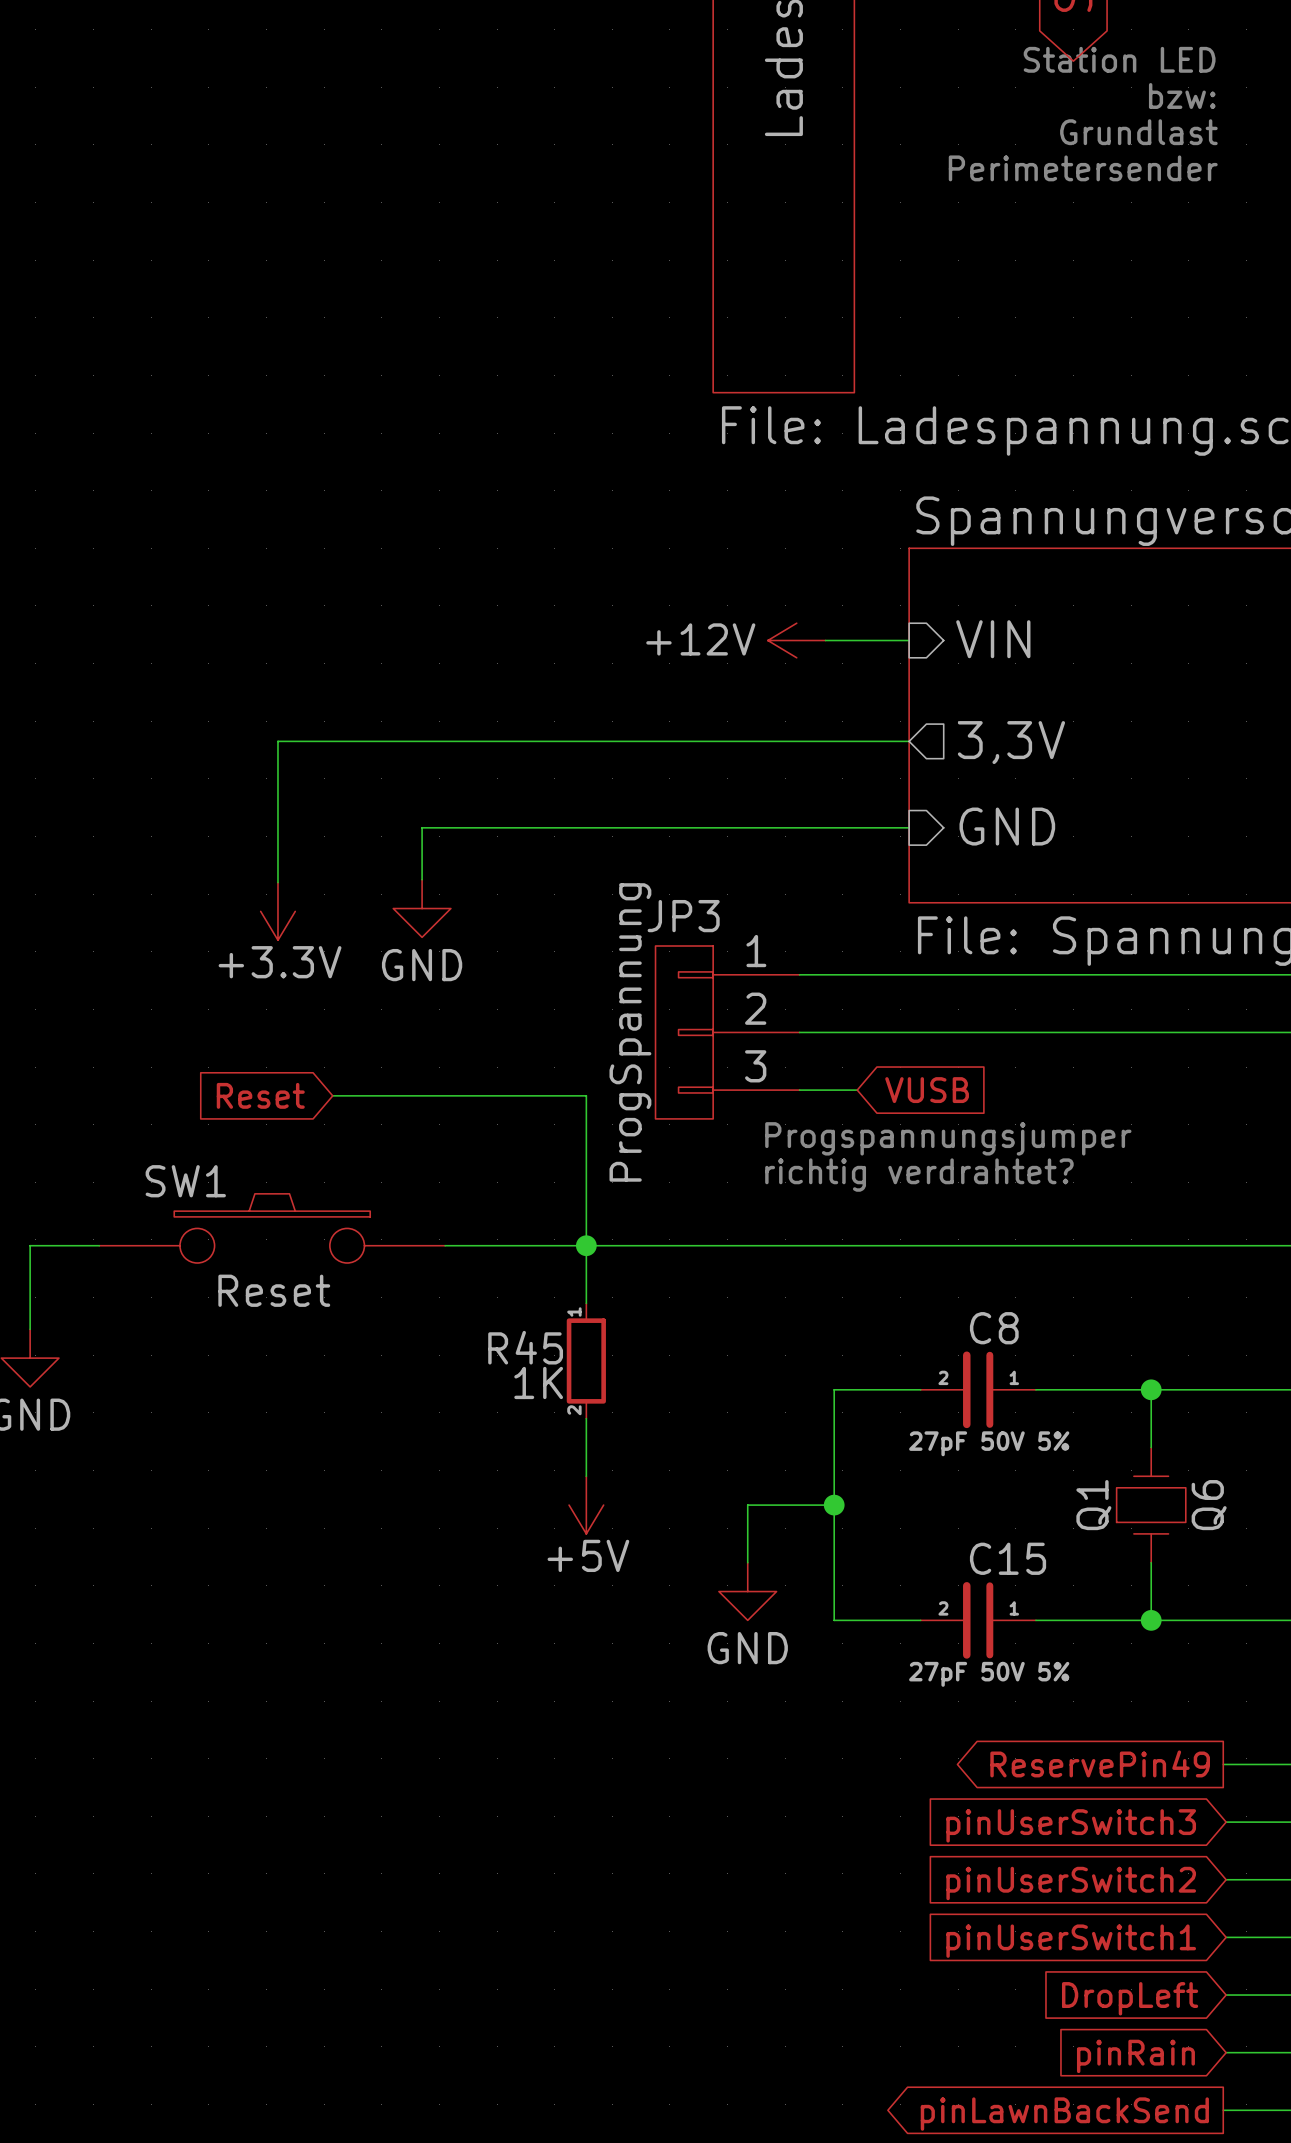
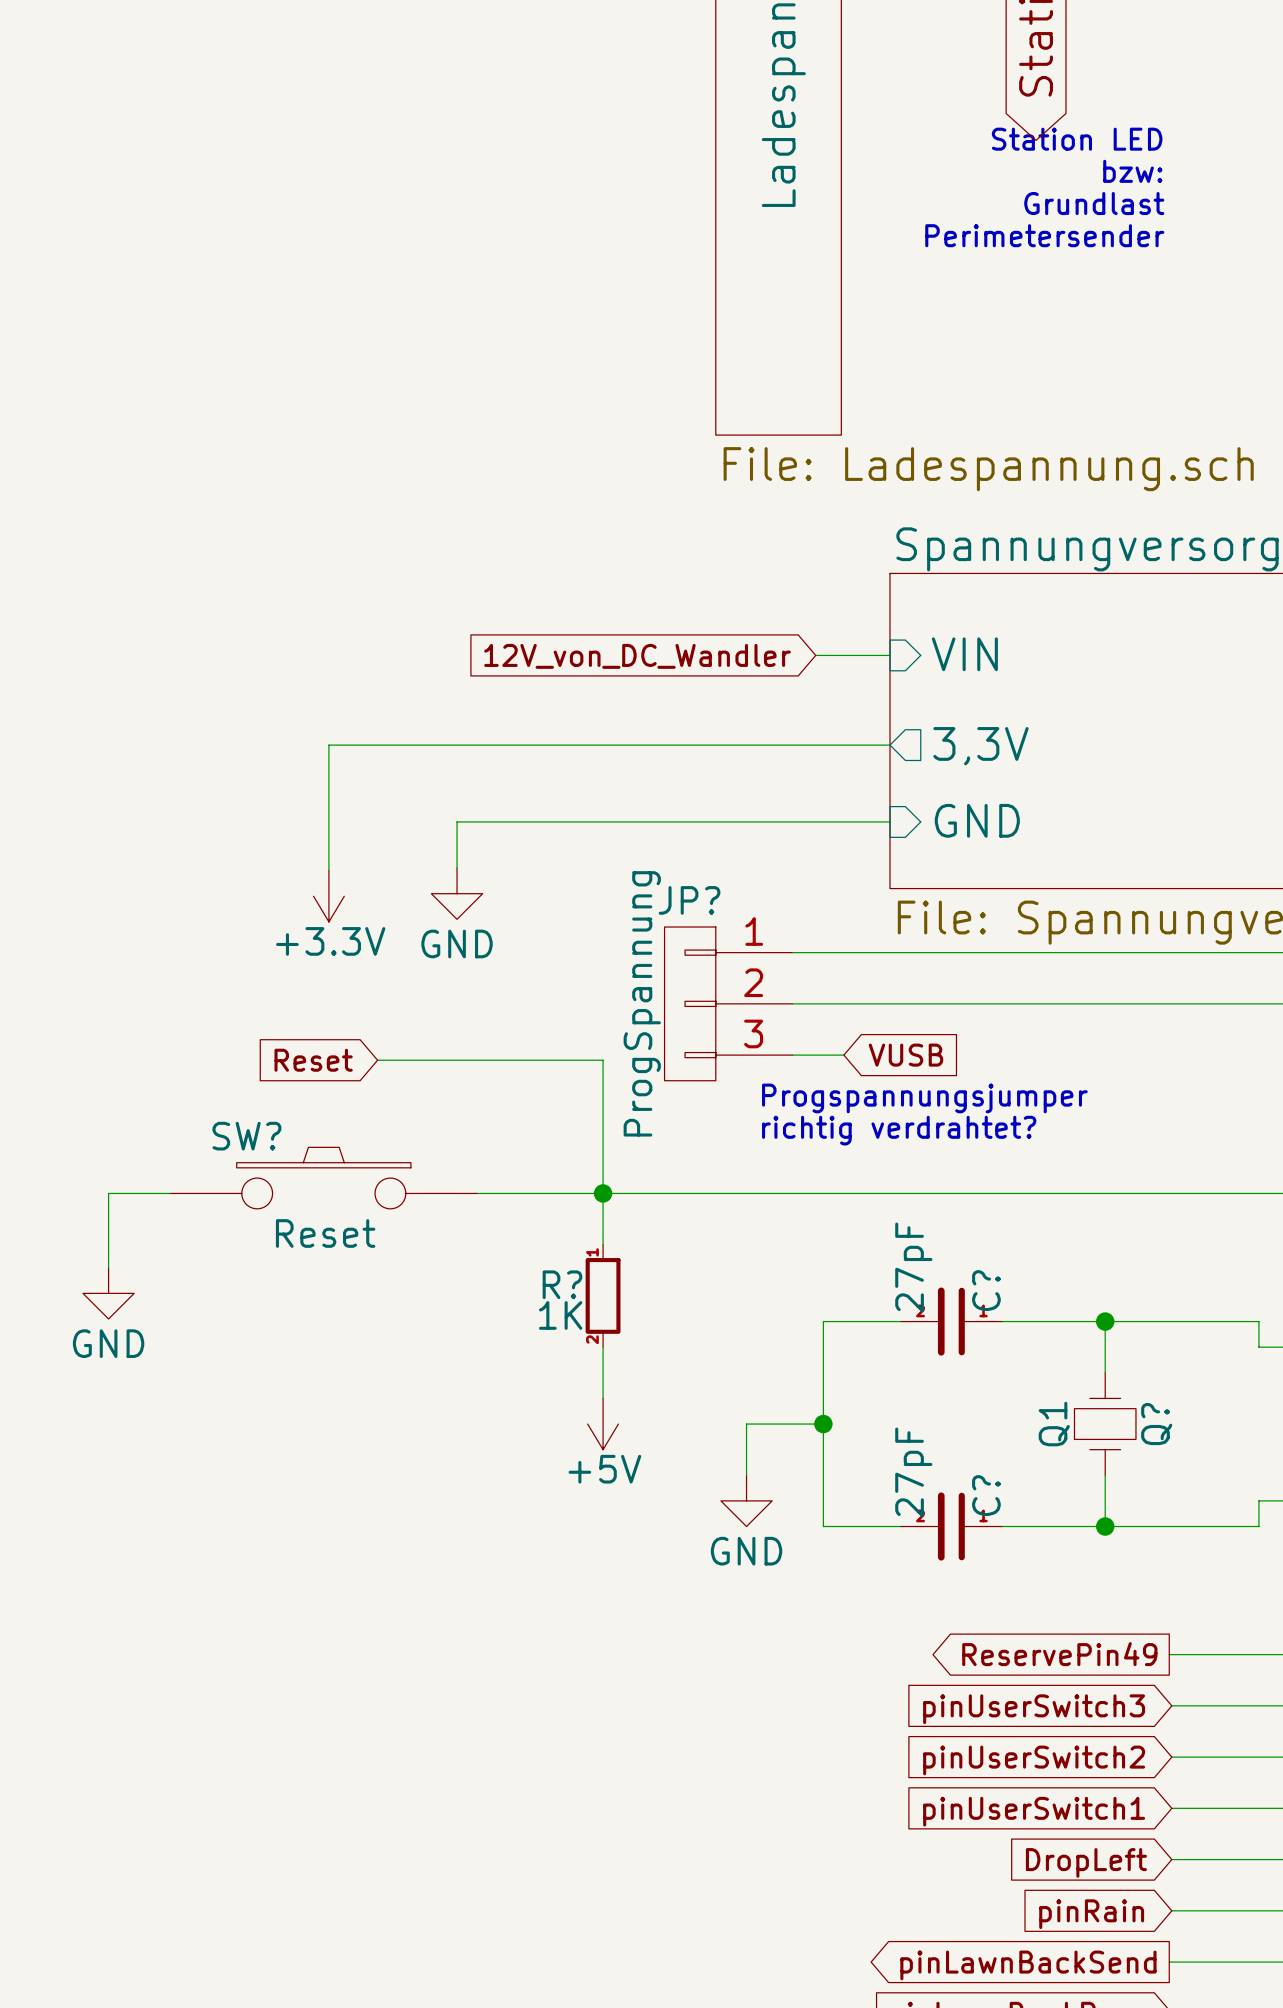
power symbol: +12V (796, 640) -> none
global label: none -> 12V_von_DC_Wandler (637, 656)
JP3 name: JP3 (683, 916) -> JP? (689, 900)
SW1 name: SW1 (185, 1181) -> SW? (246, 1136)
C8 name: C8 (994, 1328) -> C? (986, 1290)
R45 name: R45 (525, 1347) -> R? (562, 1284)
C8 value: 27pF 50V 5% (989, 1443) -> 27pF (913, 1267)
Q6 name: Q6 (1209, 1505) -> Q? (1156, 1424)
C15 name: C15 (1008, 1558) -> C? (986, 1495)
C15 value: 27pF 50V 5% (989, 1674) -> 27pF (913, 1472)

